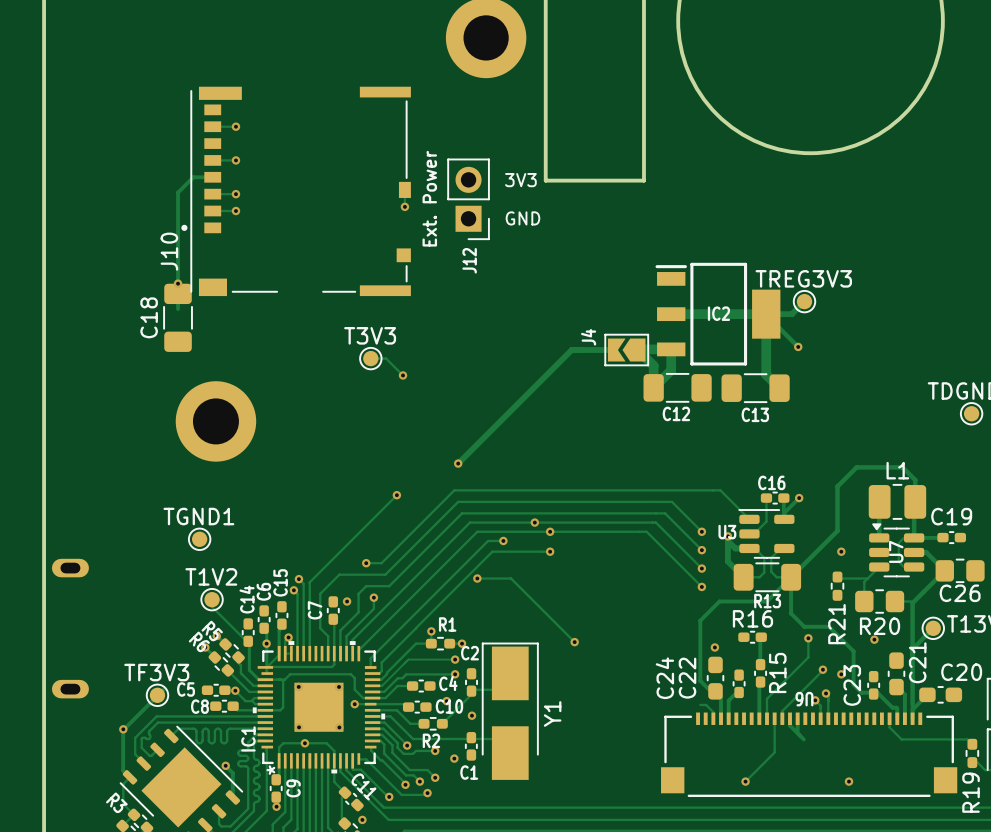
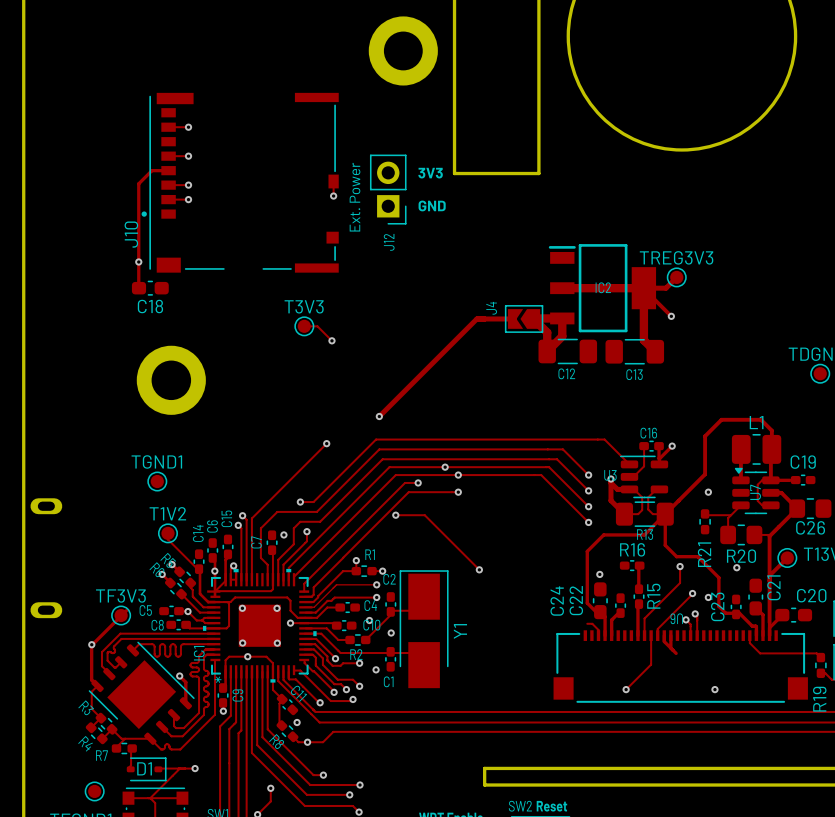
C18 footprint: [163, 283, 193, 352] -> [131, 280, 169, 296]
C18 name position: C18 (149, 317) -> C18 (150, 306)

